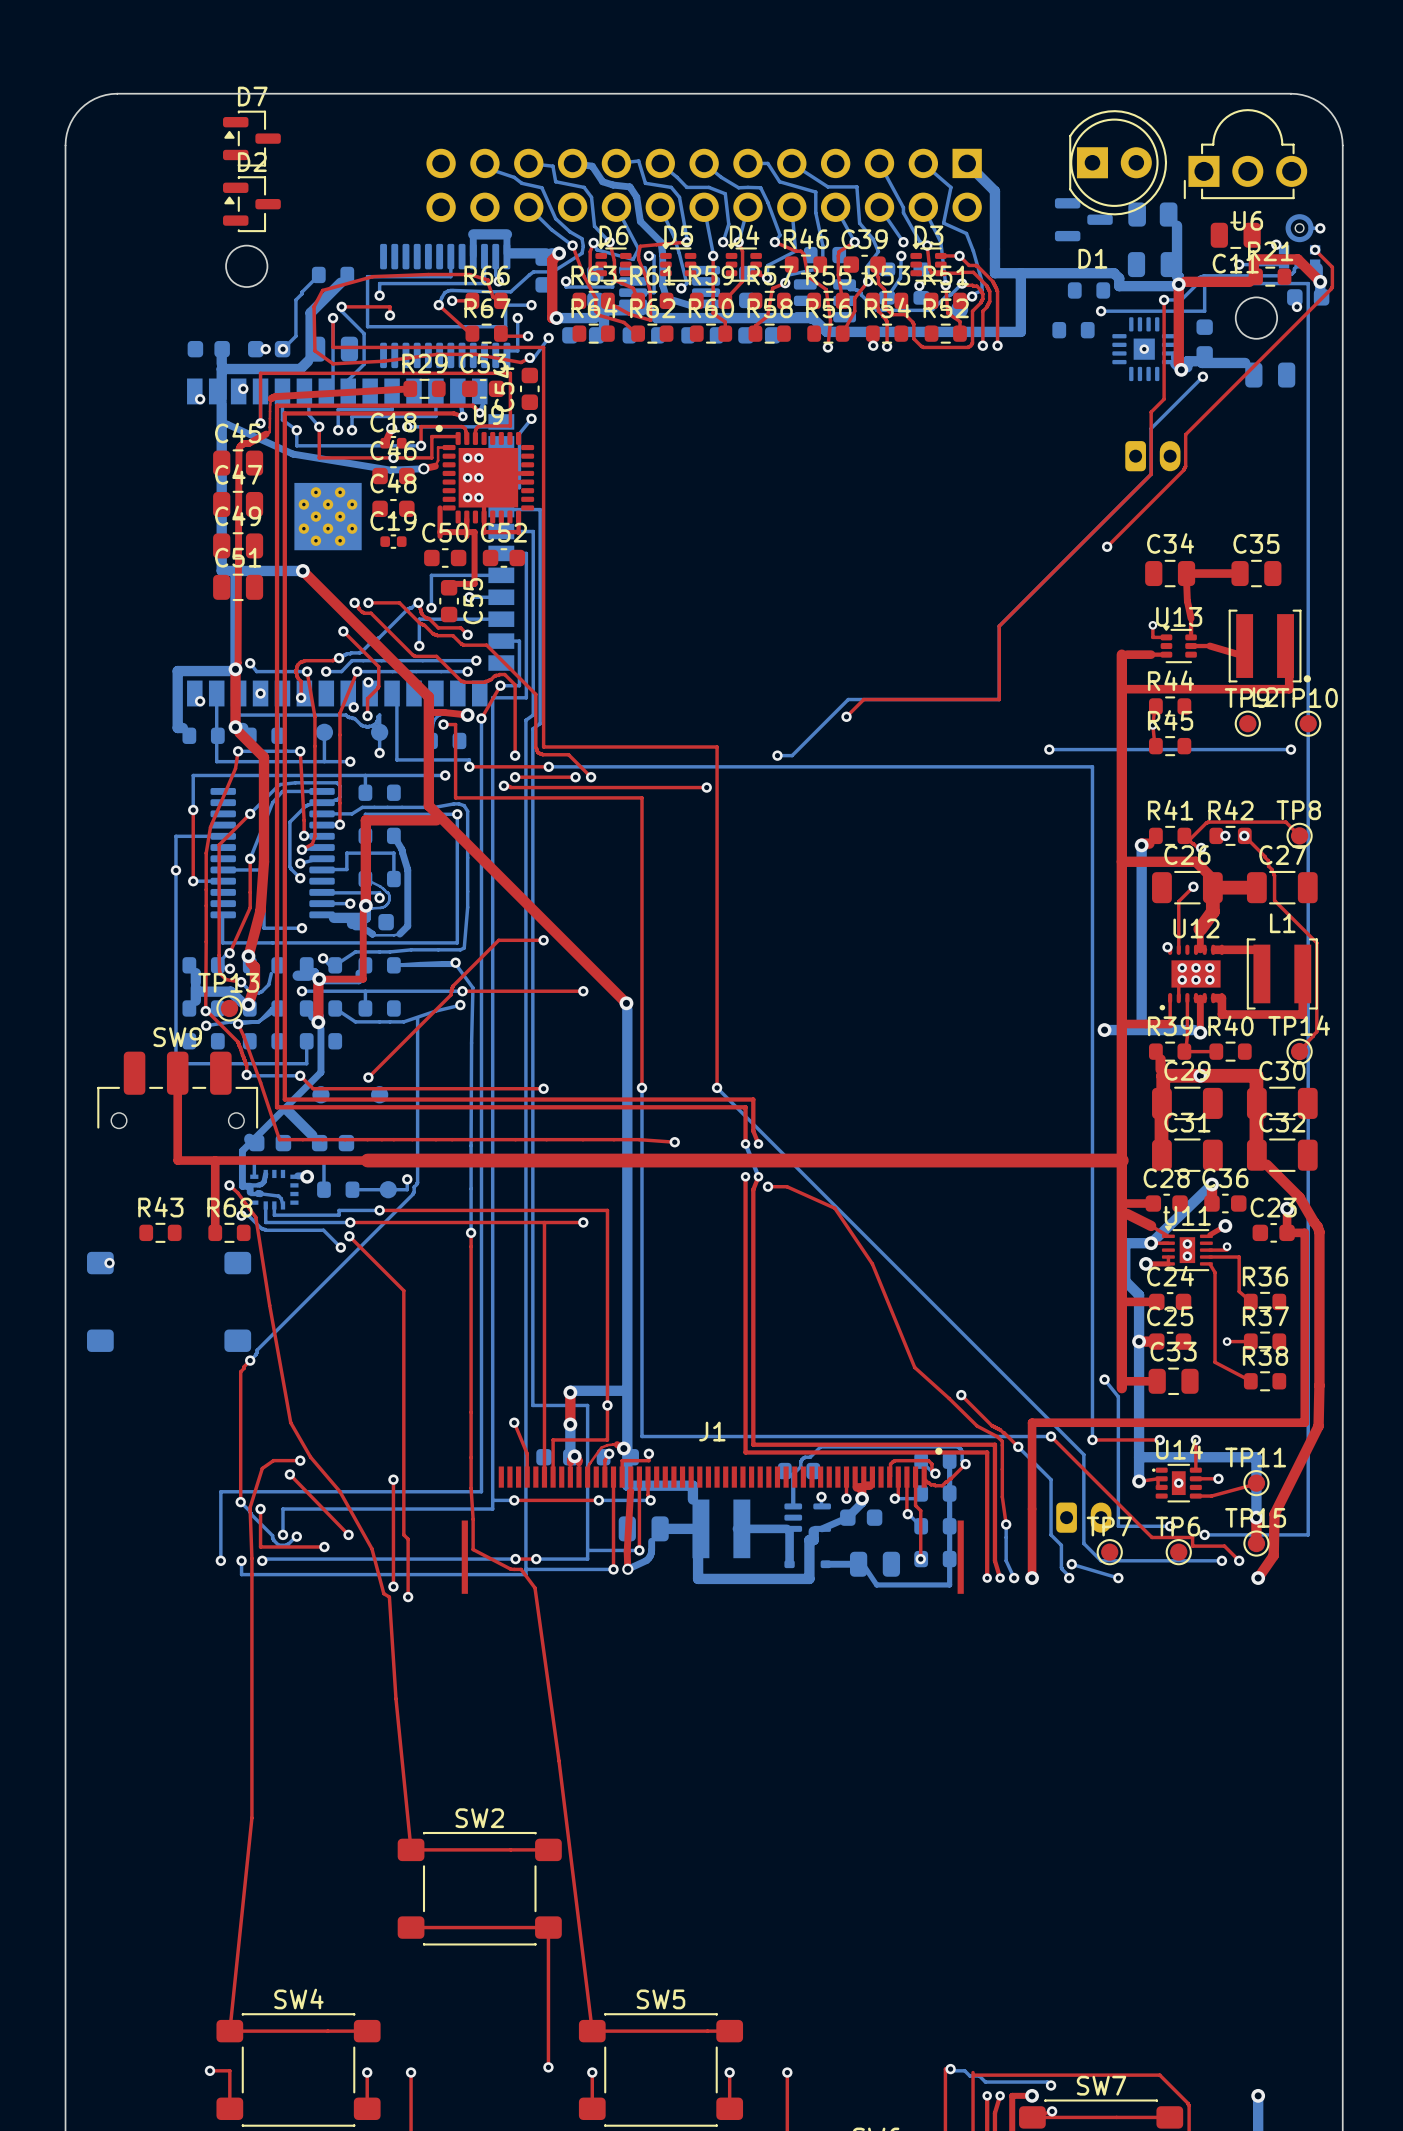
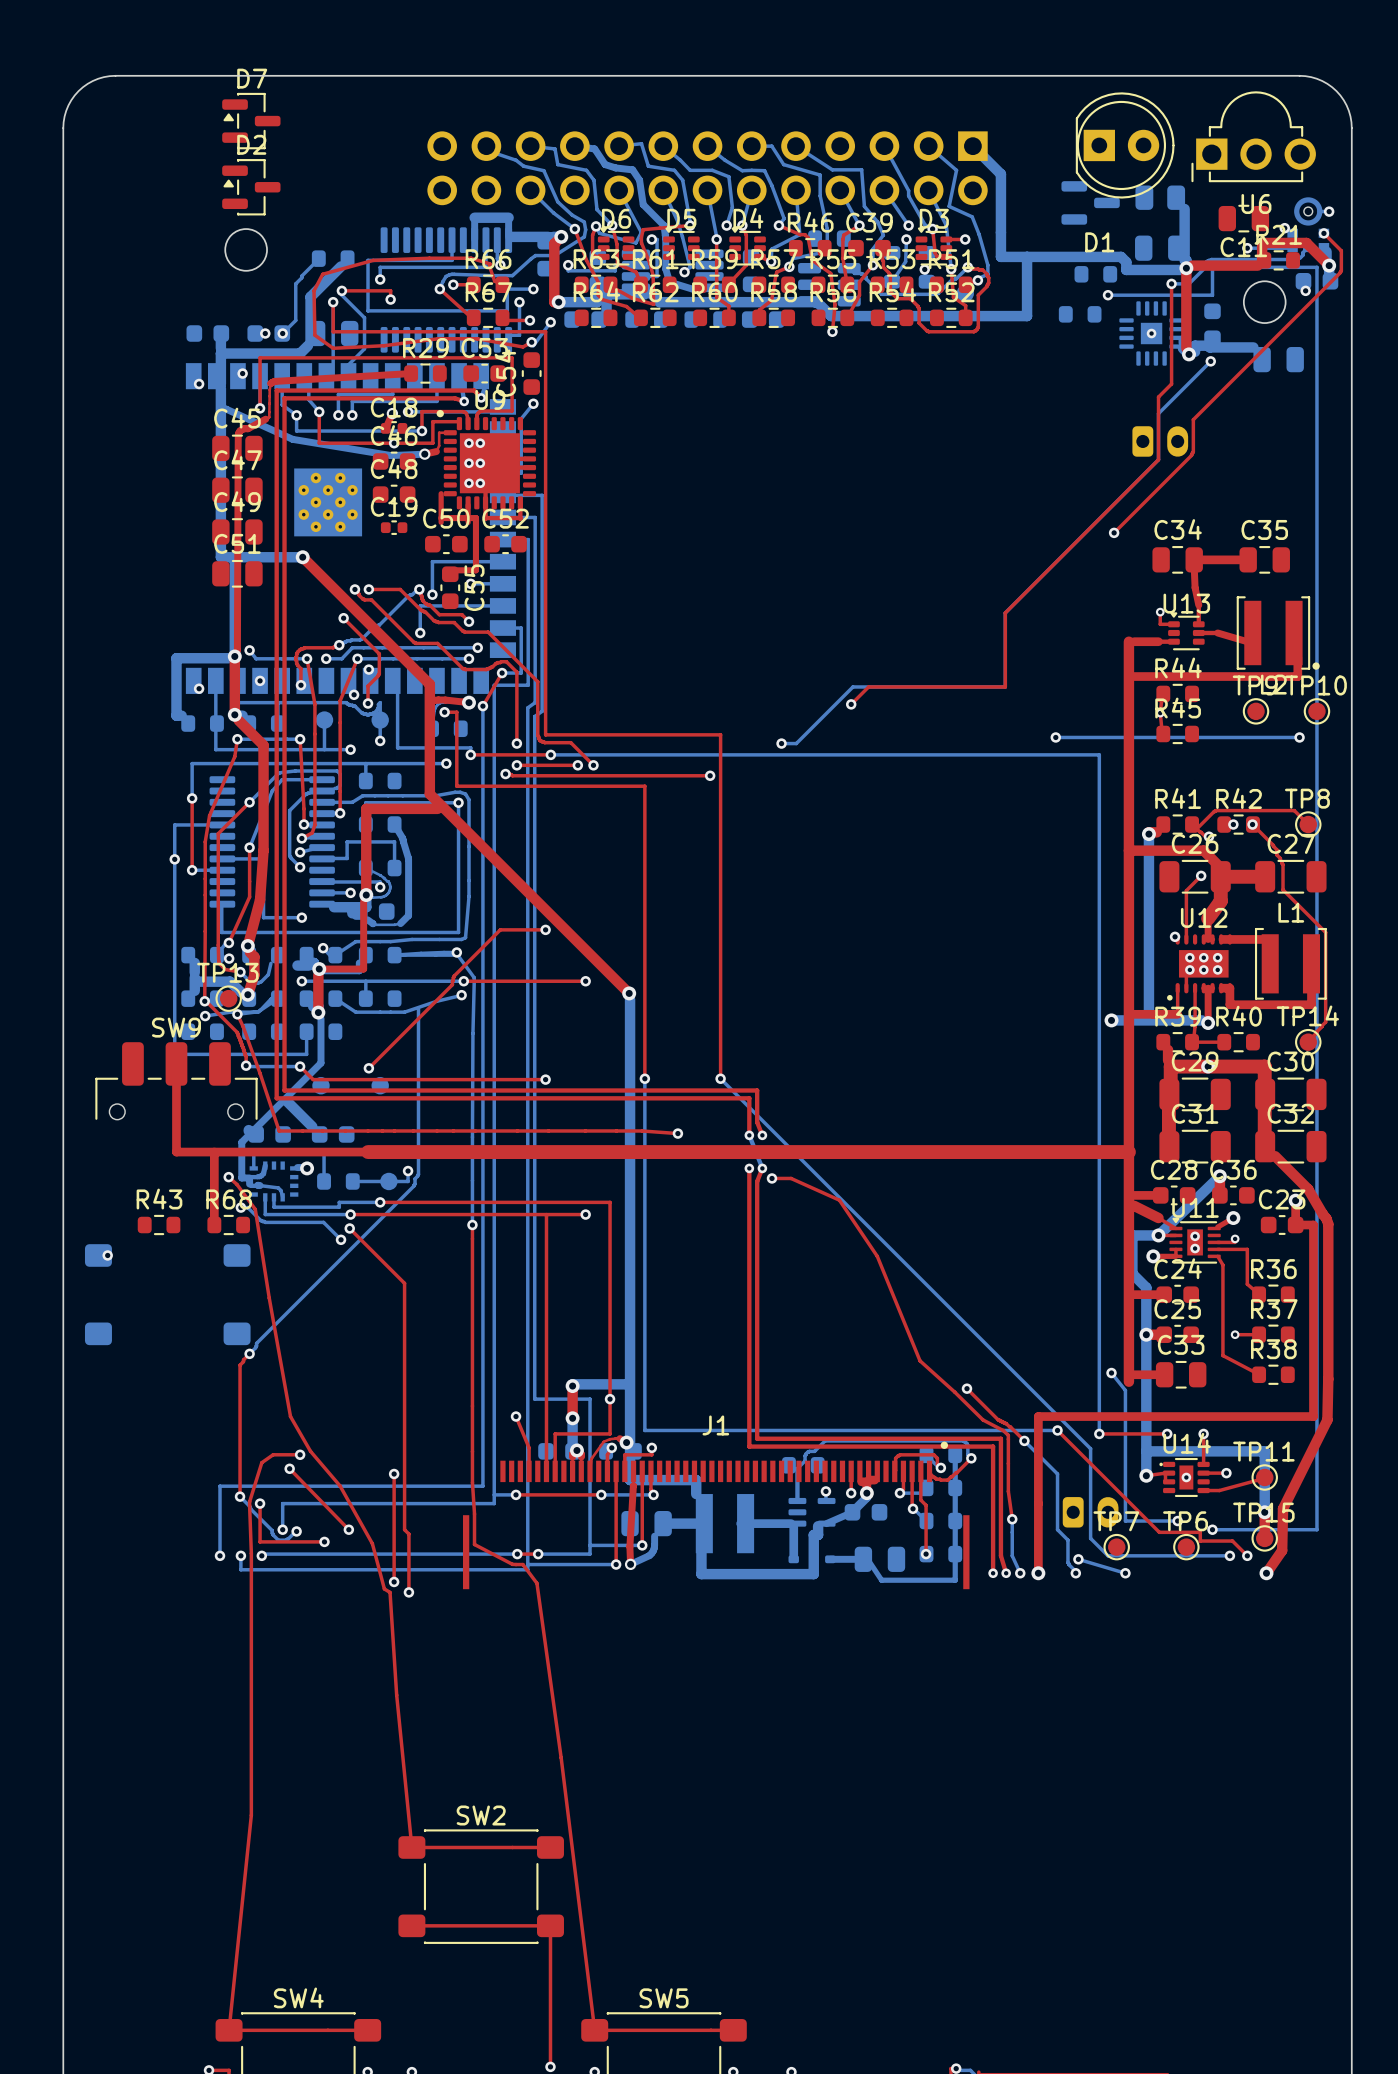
top track: (959, 255) (969, 265) (977, 266) (993, 281) (996, 288) (997, 345) -> none
top track: (940, 273) (973, 272) (987, 286) (989, 291) (989, 301) (982, 311) (982, 345) -> none
top track: (872, 300) (887, 321) (887, 346) -> none
via: (873, 345) -> none
via: (982, 345) -> none
via: (997, 345) -> none
via: (887, 346) -> none

